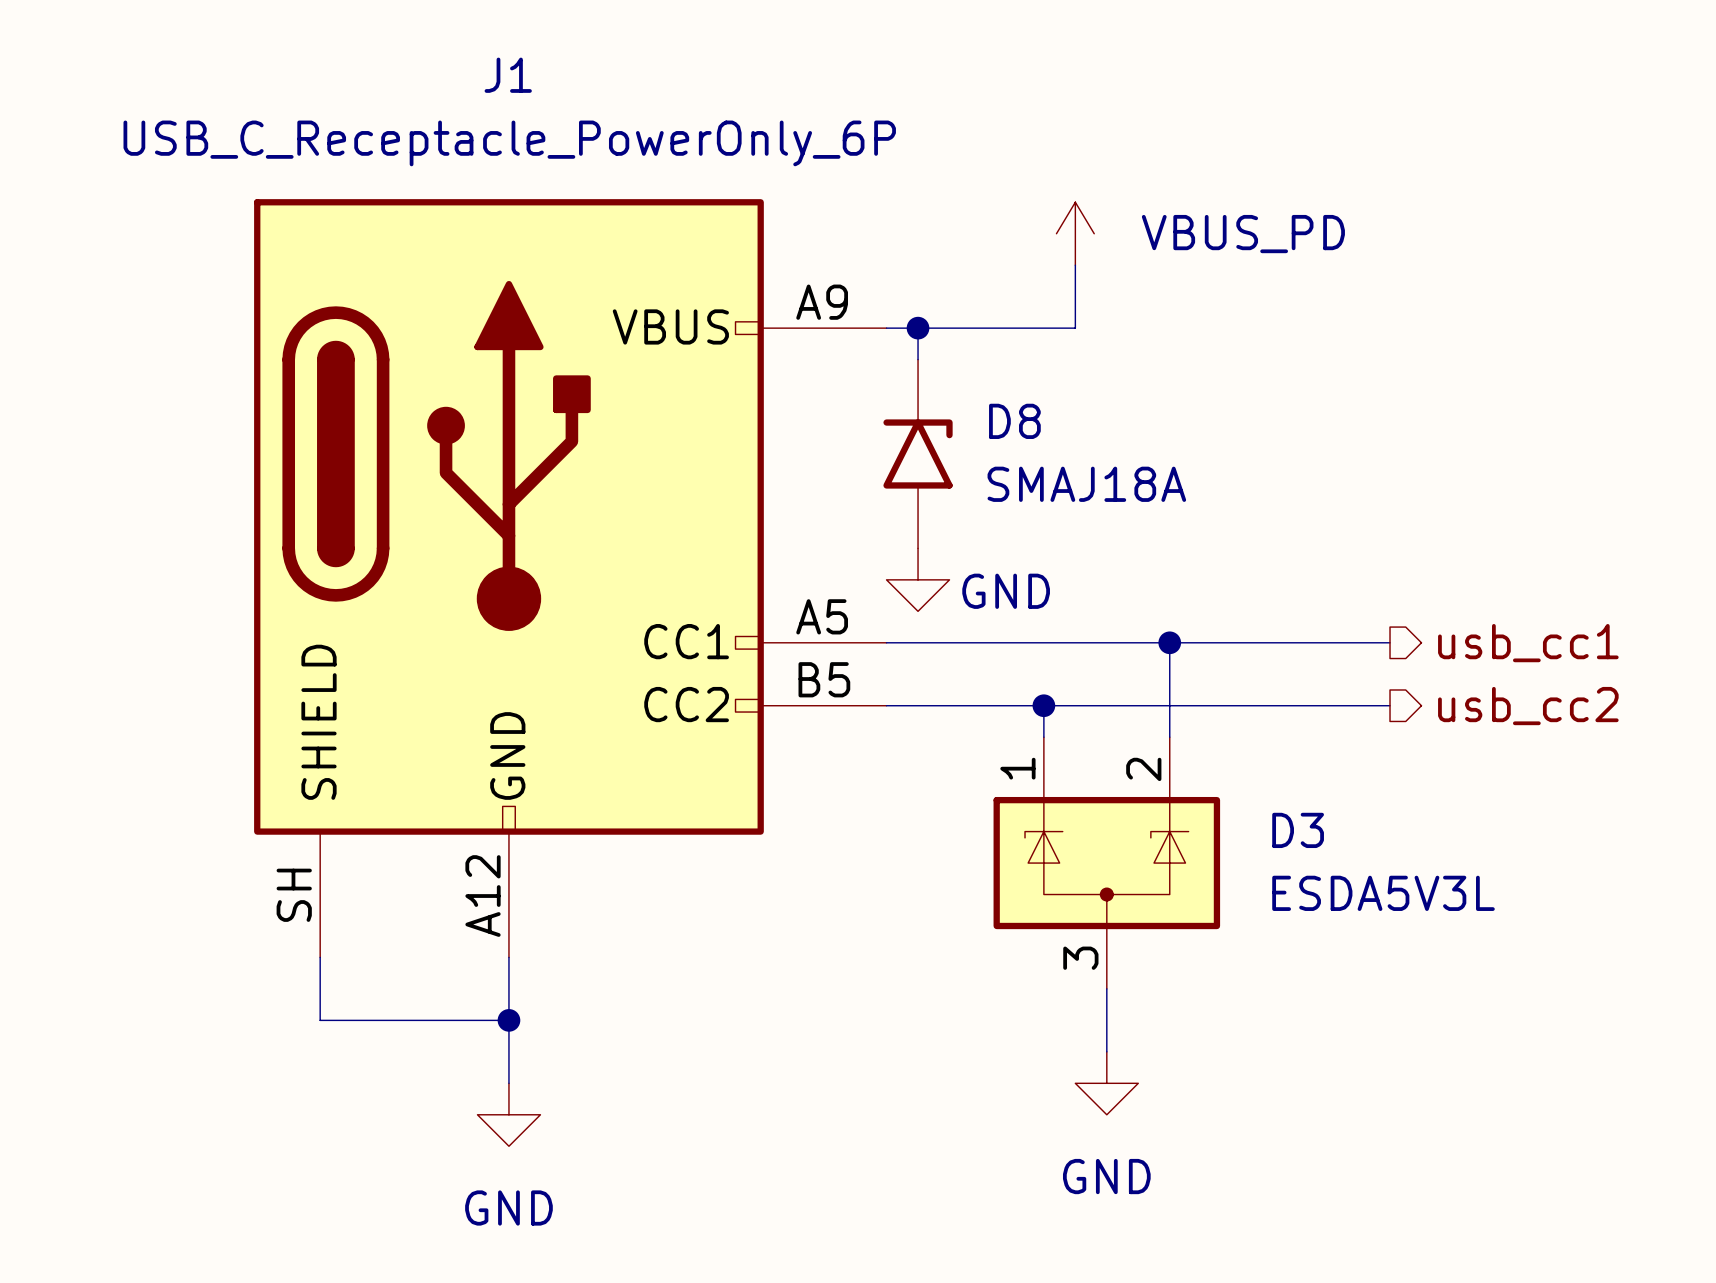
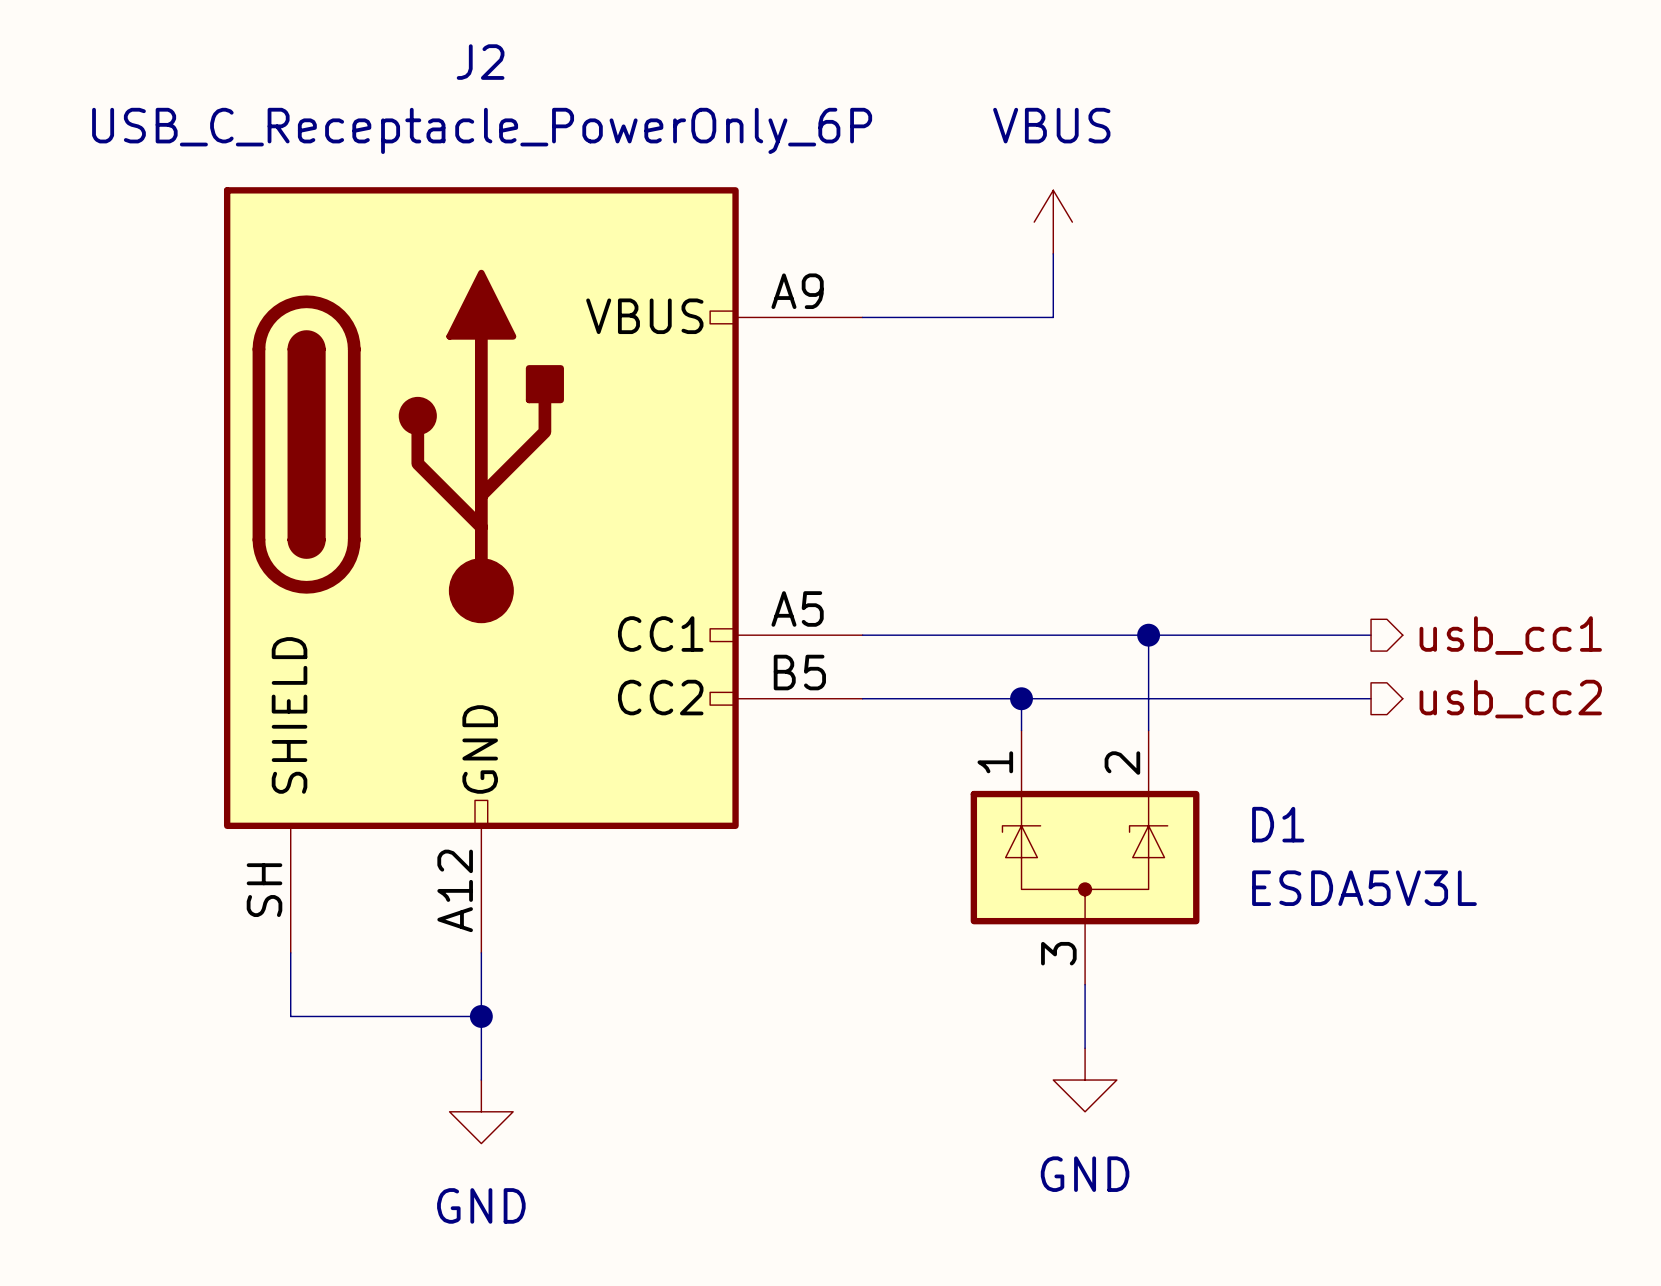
J1 name: J1 (508, 75) -> J2 (480, 62)
power symbol: VBUS_PD (1075, 233) -> VBUS (1053, 222)
wire: (918, 328) (918, 359) -> none
junction: (918, 328) -> none
D8: SMAJ18A (918, 454) -> none
power symbol: GND (918, 579) -> none
D3 name: D3 (1298, 830) -> D1 (1278, 824)

